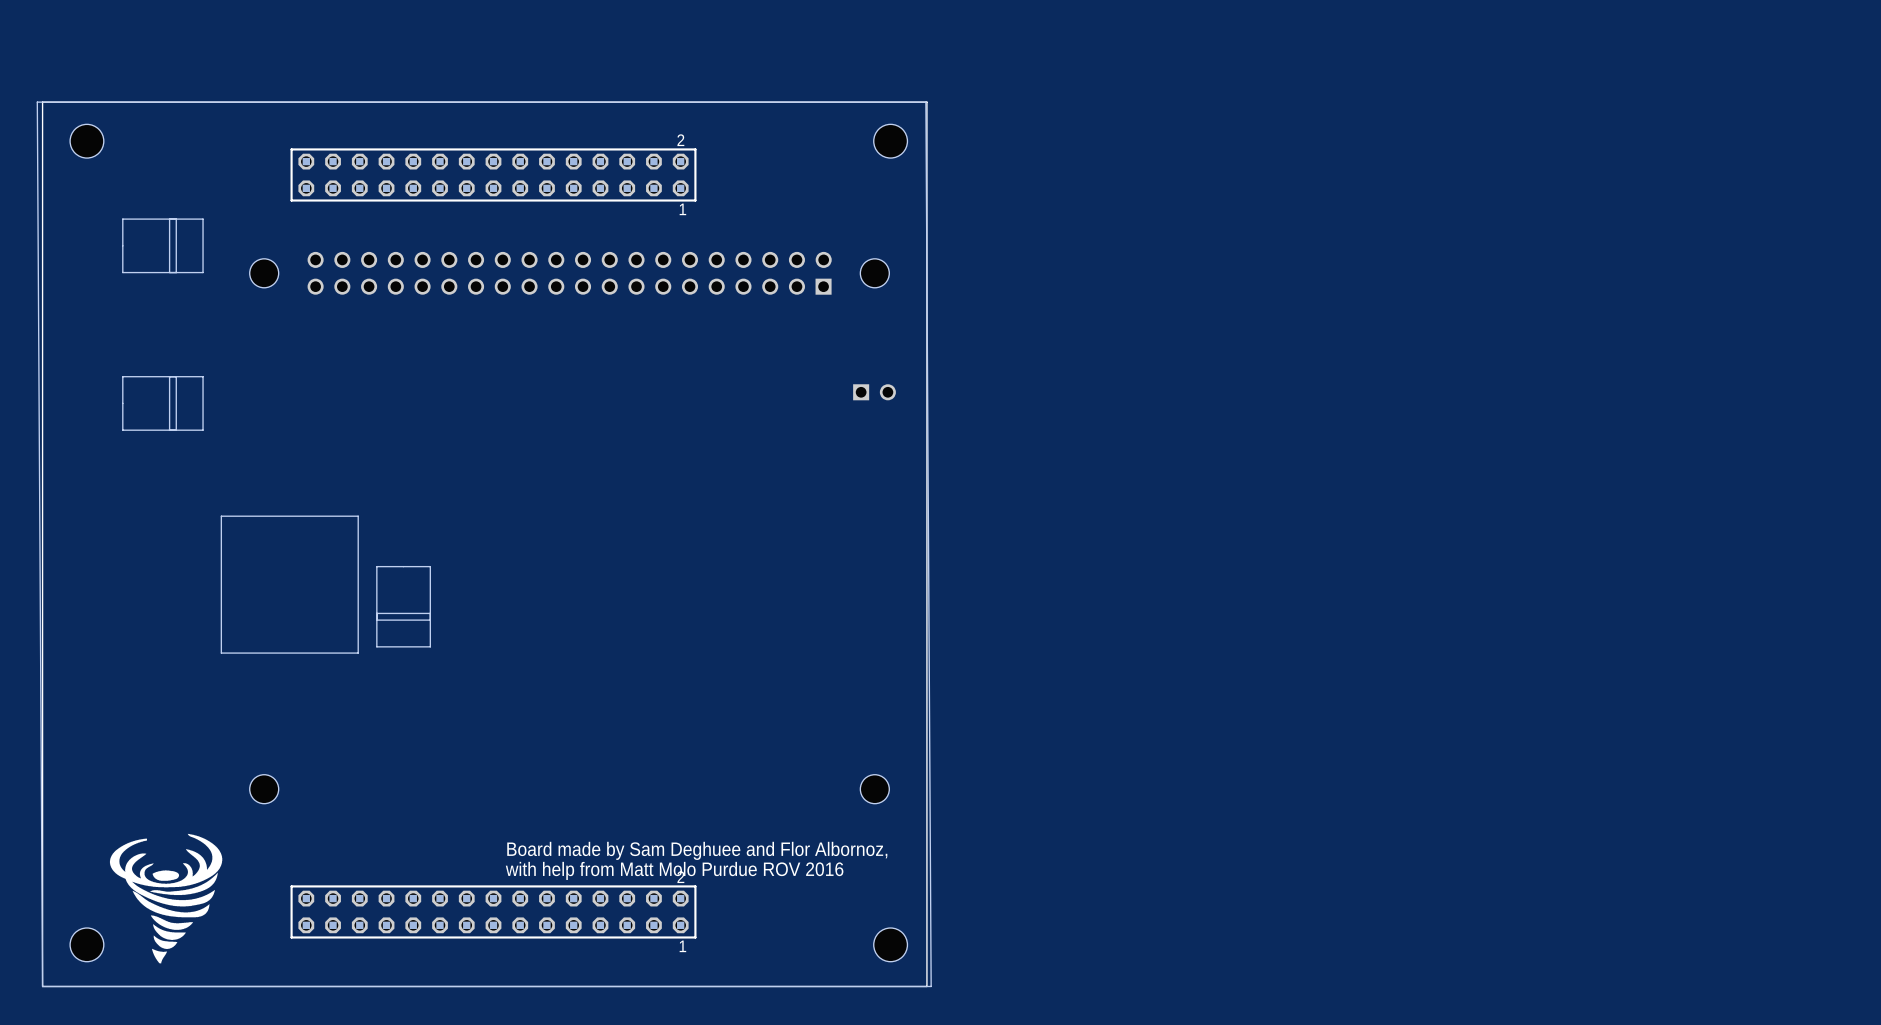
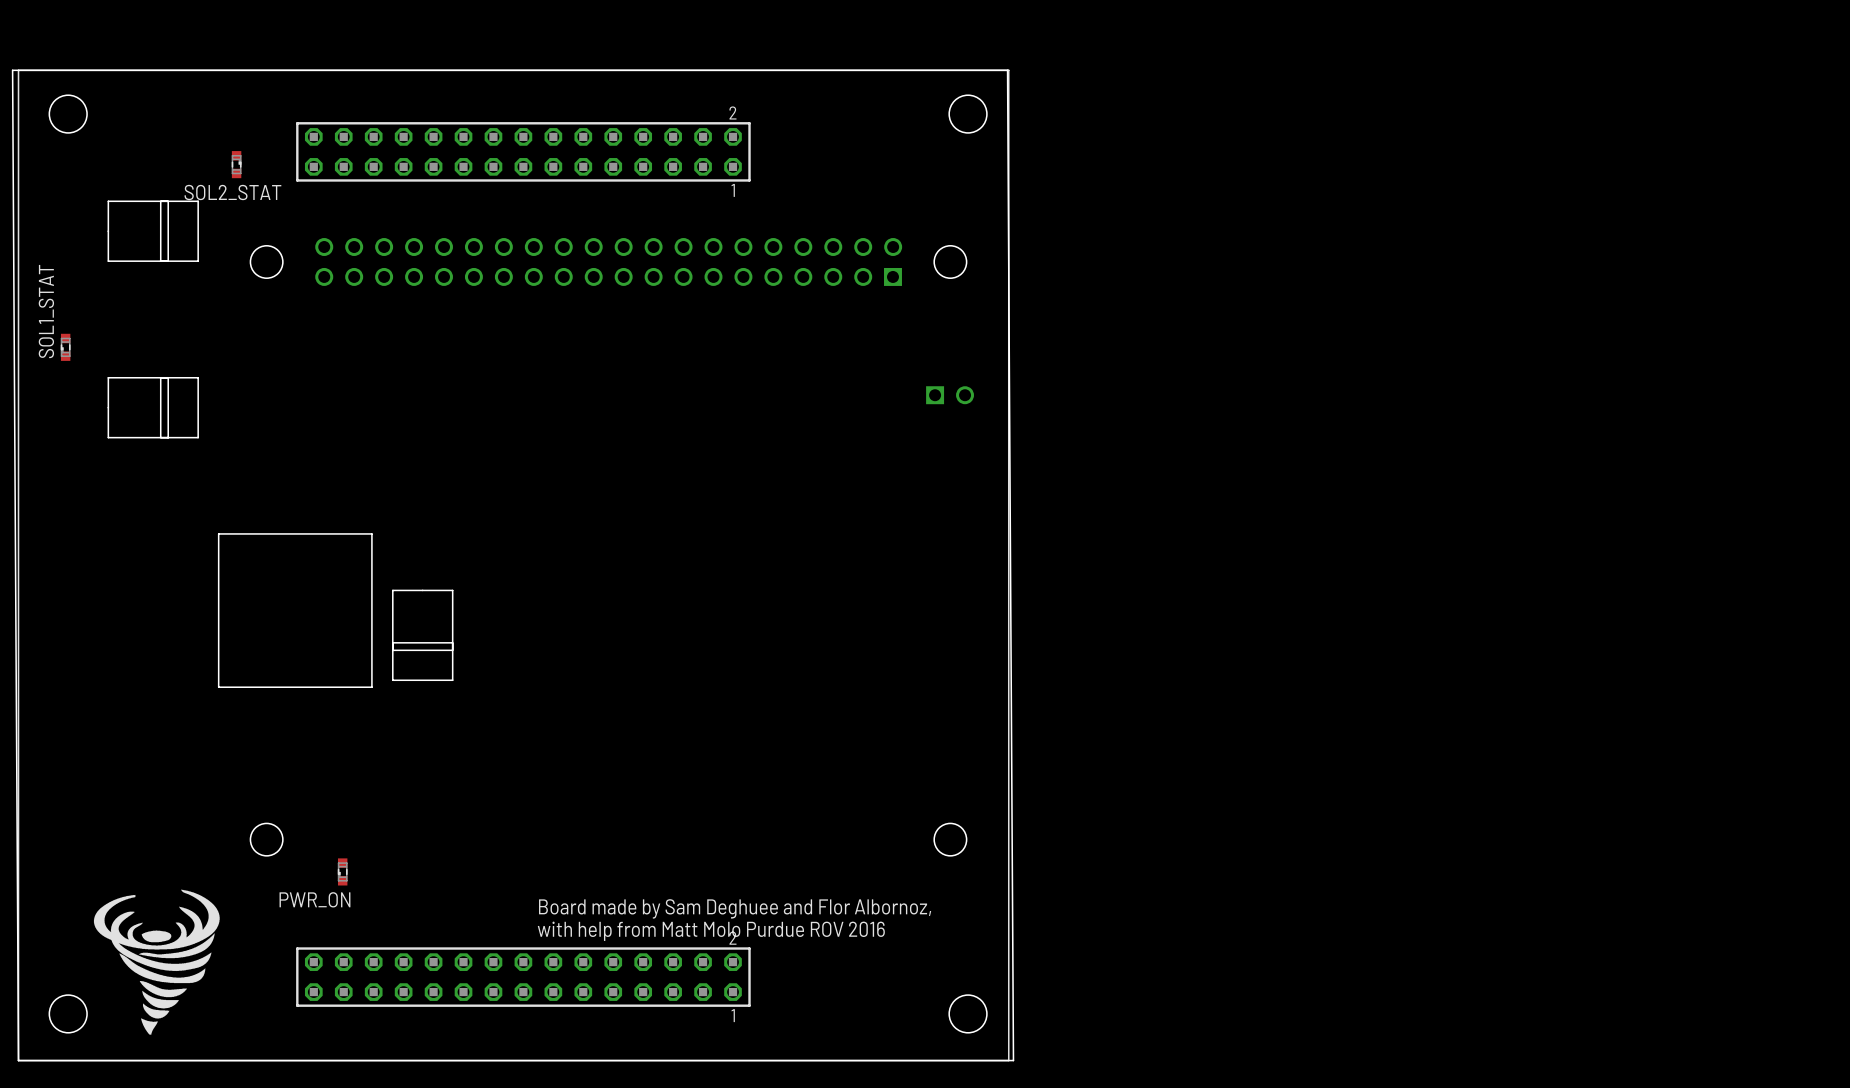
SOL2_STAT: none -> (236, 164)
SOL1_STAT: none -> (65, 347)
PWR_ON: none -> (342, 871)

